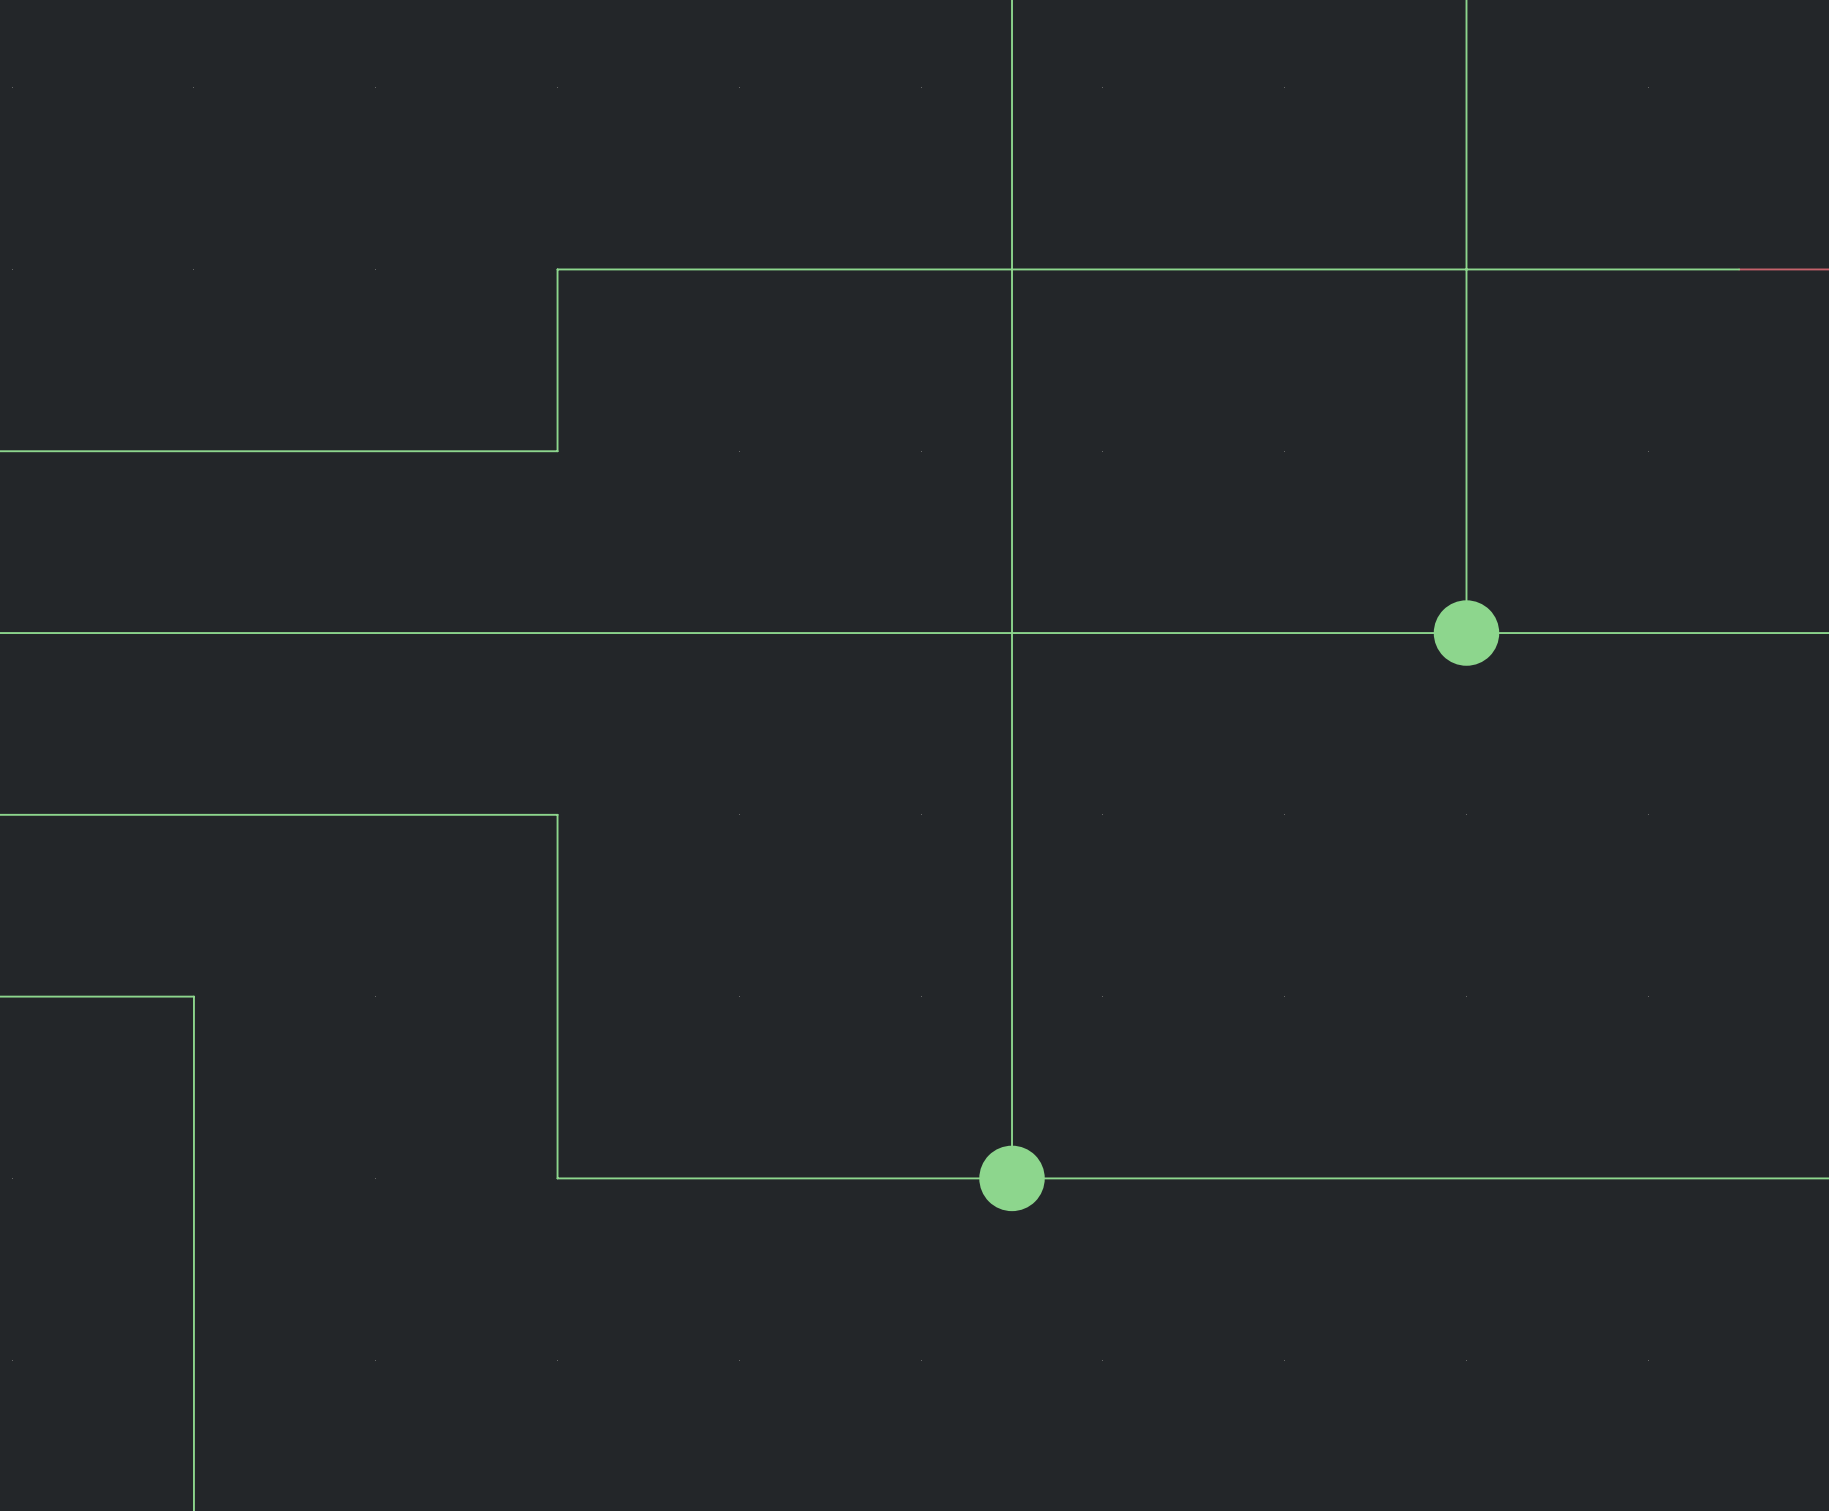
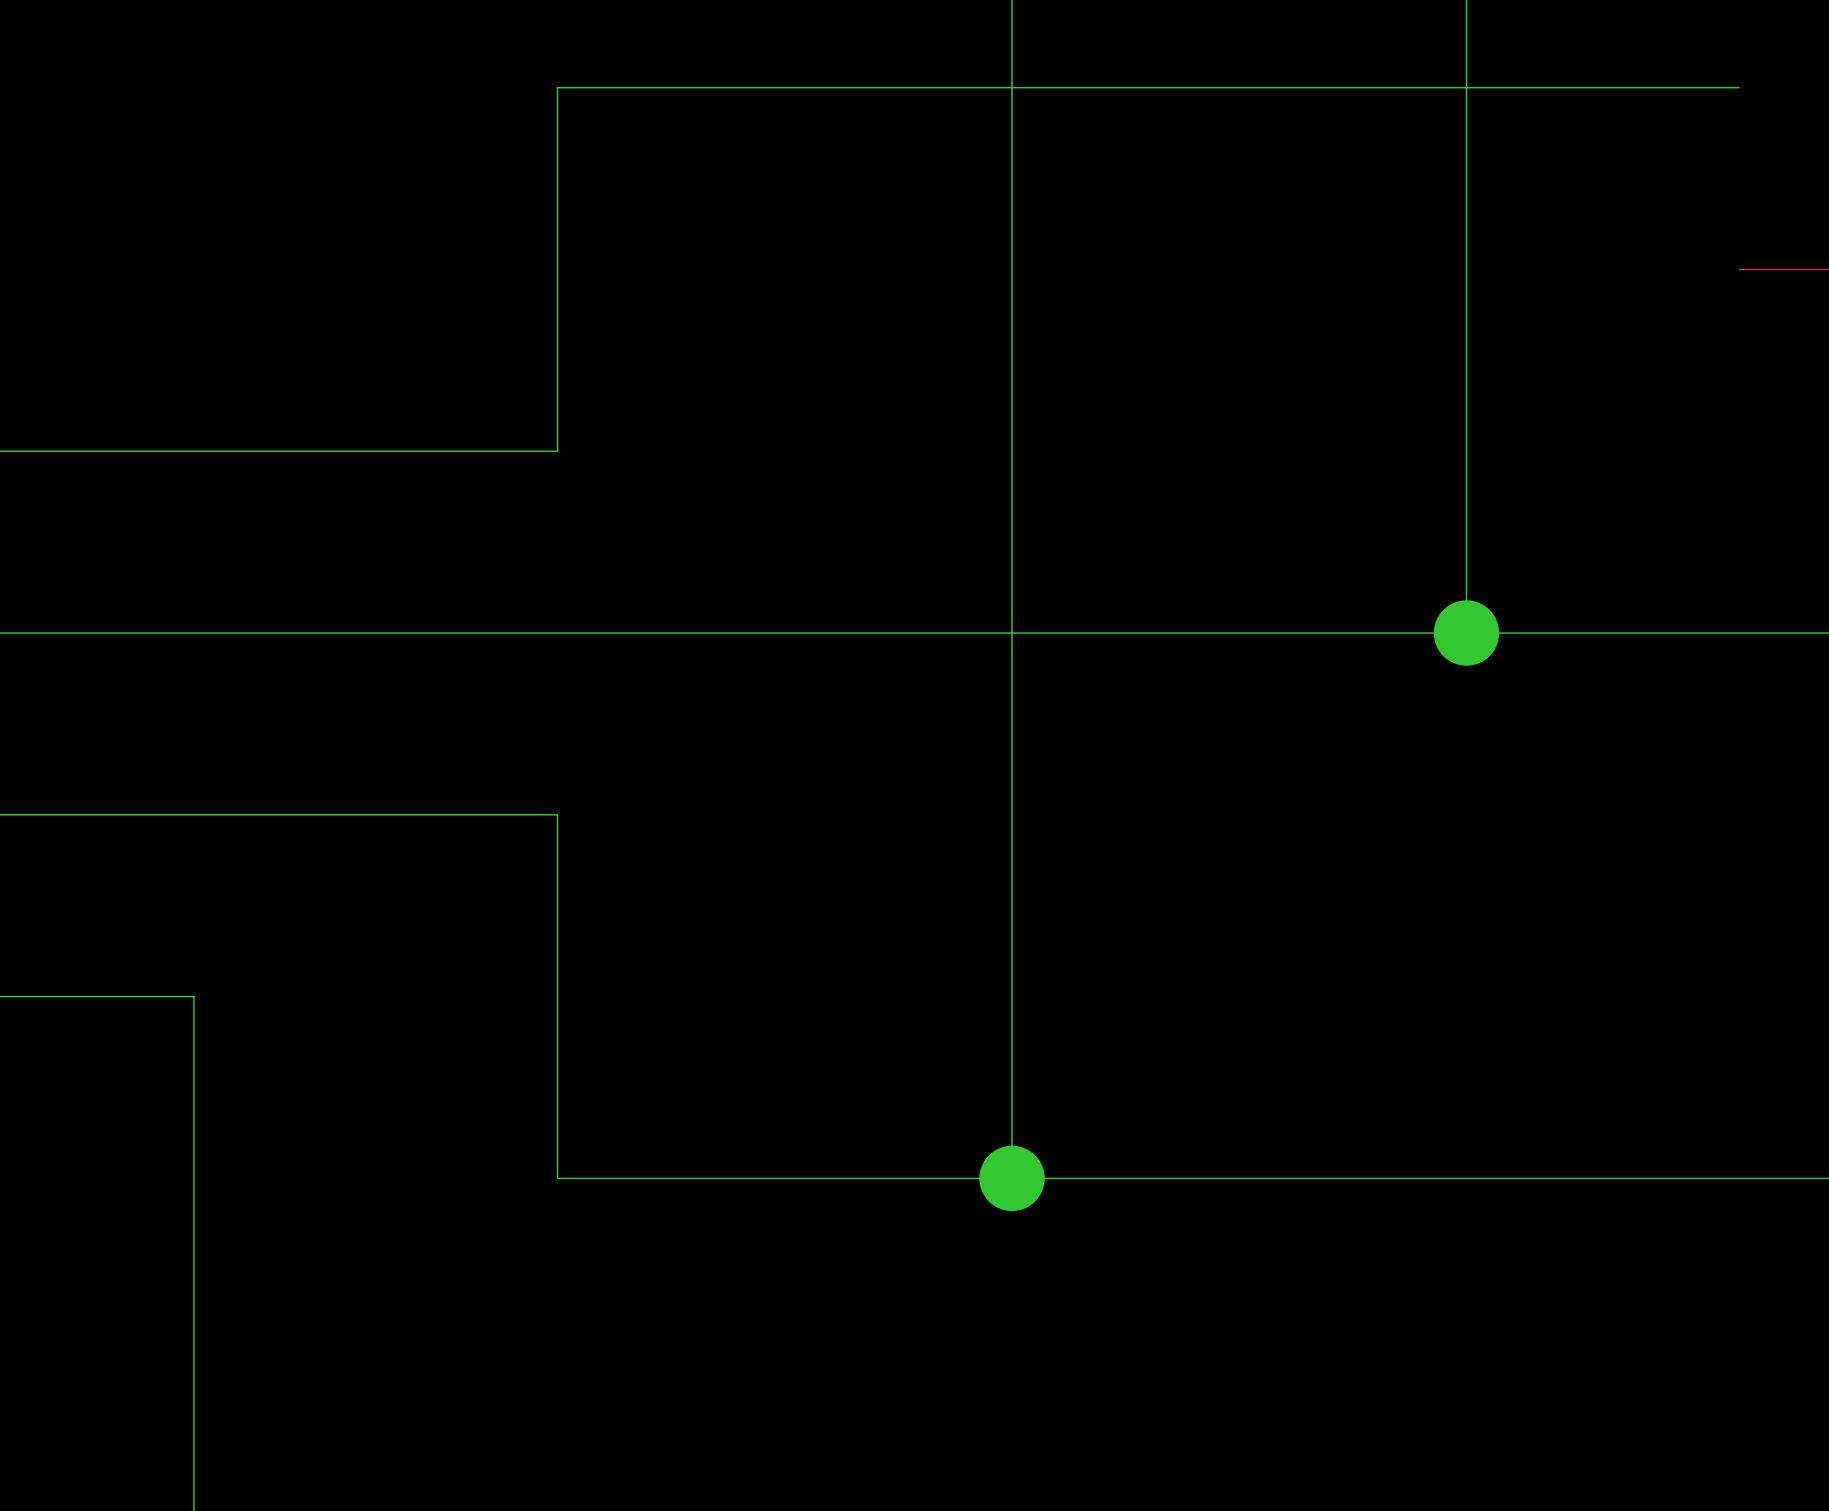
wire: (557, 269) (1739, 269) -> (557, 269) (557, 87) (1739, 87)

